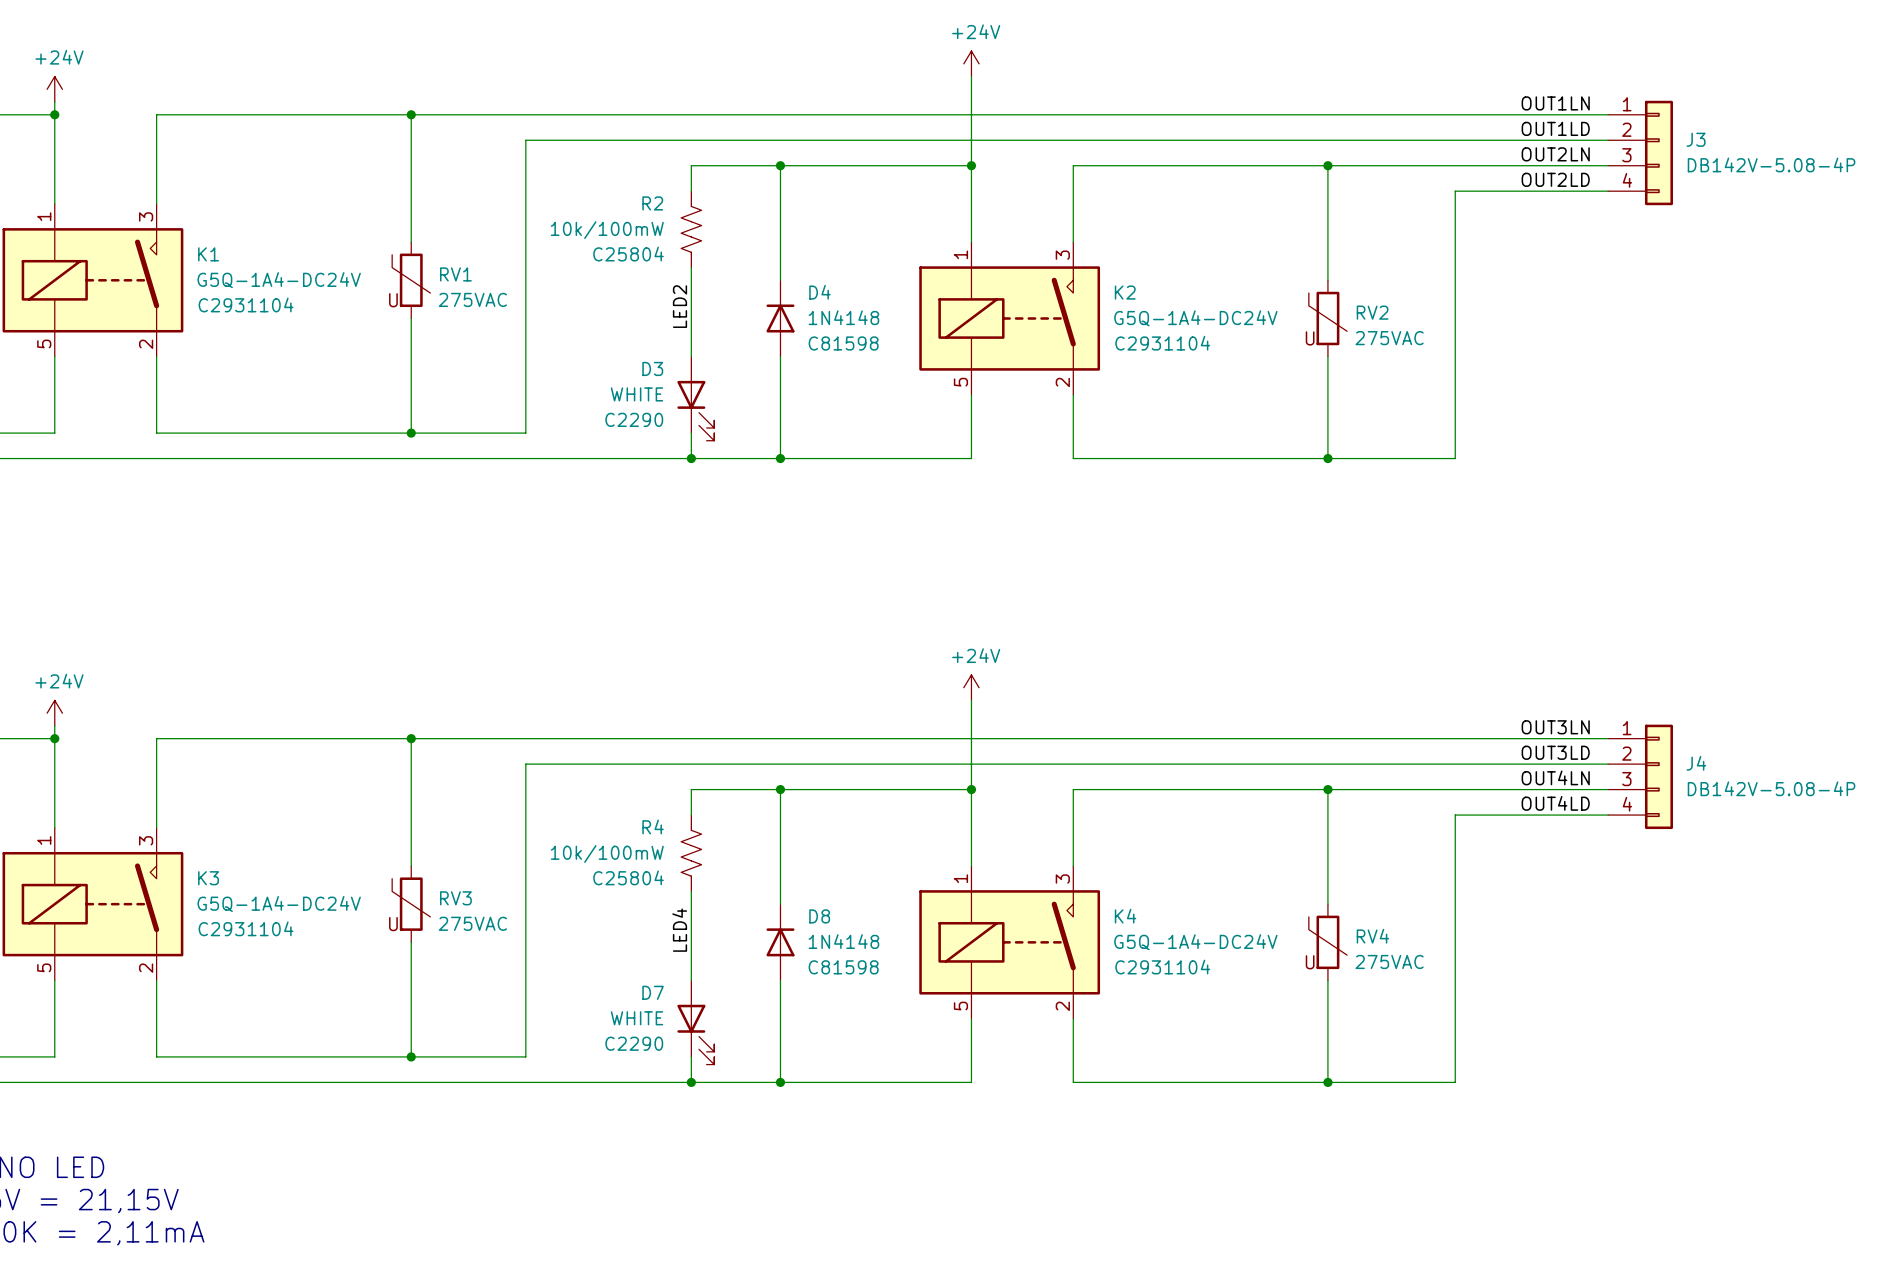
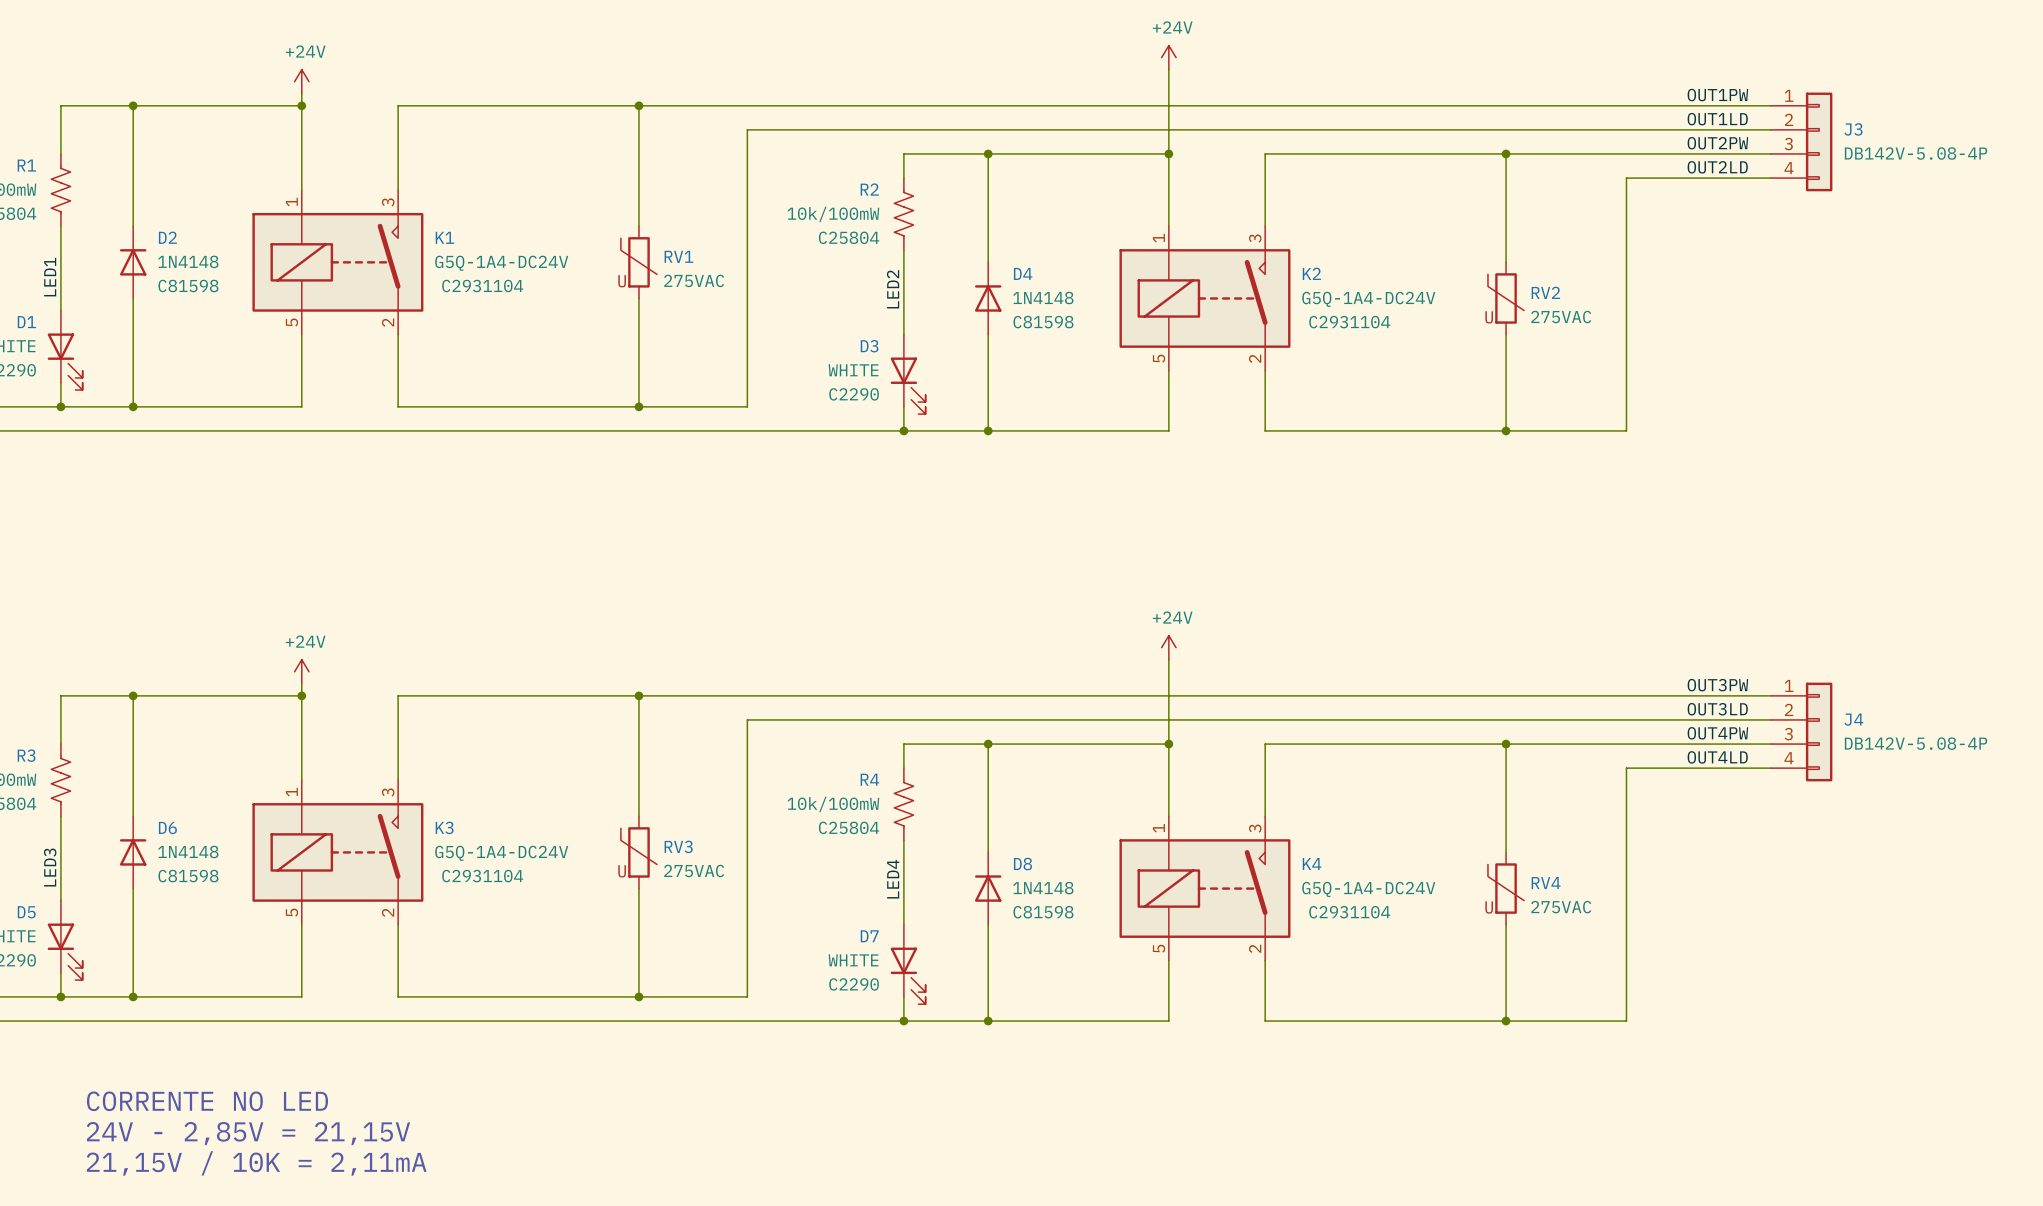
label: OUT1LN (1555, 103) -> OUT1PW (1717, 95)
label: OUT2LN (1555, 154) -> OUT2PW (1717, 143)
label: OUT3LN (1555, 727) -> OUT3PW (1717, 685)
label: OUT4LN (1555, 777) -> OUT4PW (1717, 733)

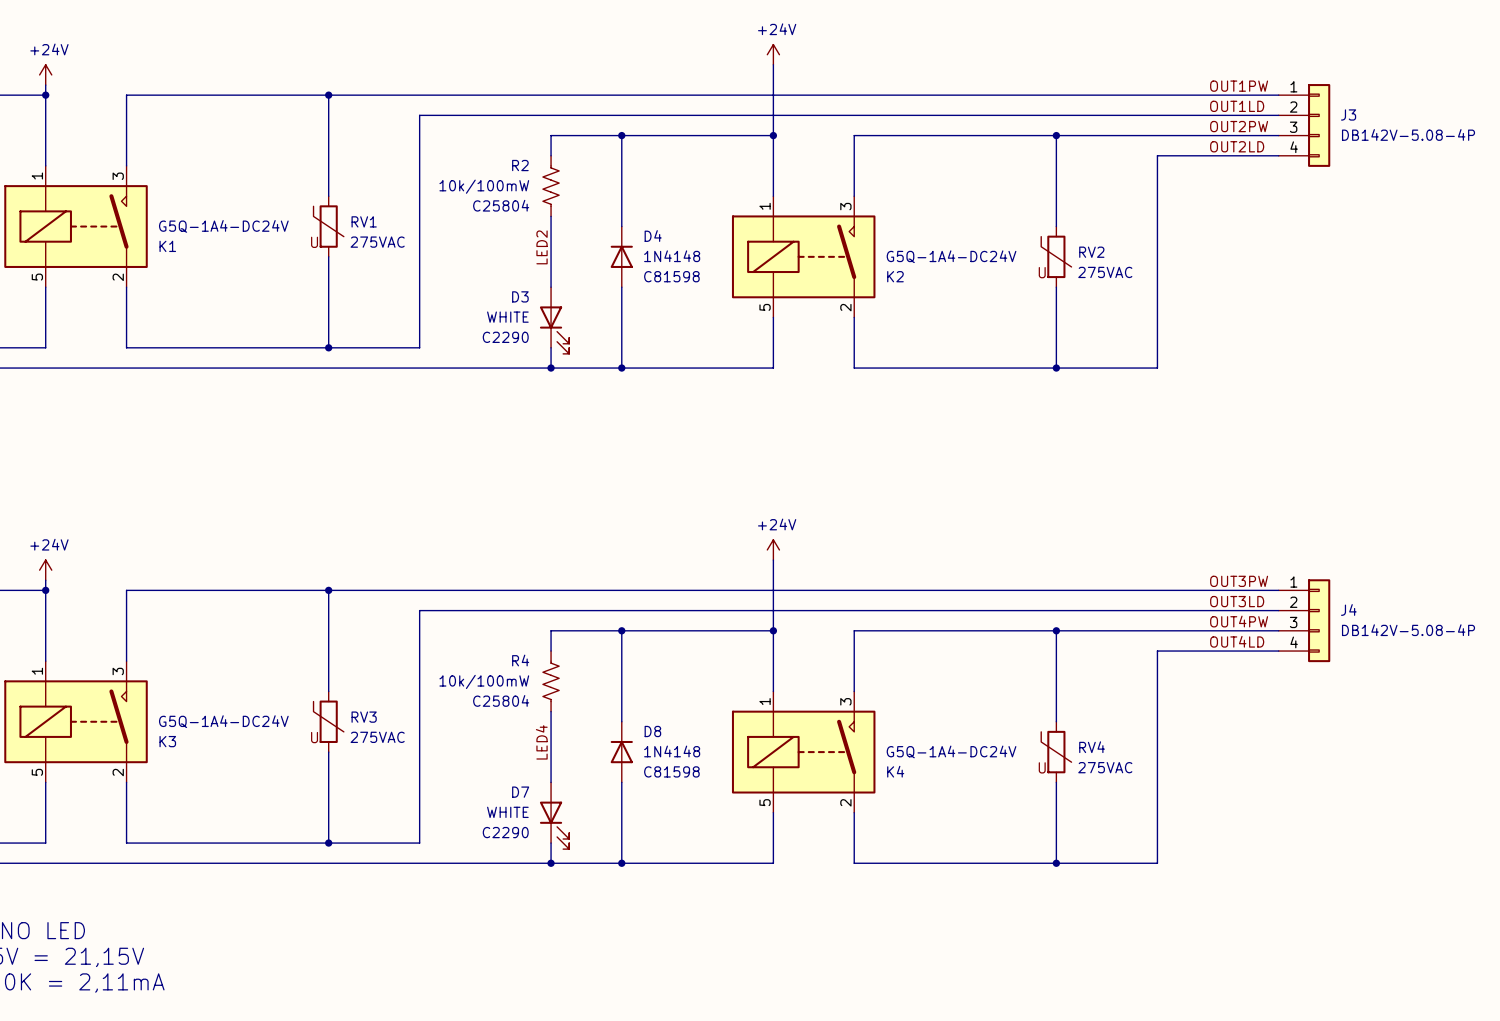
K1 name position: K1 (444, 237) -> K1 (167, 246)
K2 name position: K2 (1311, 273) -> K2 (895, 276)
K1 text: C2931104 (482, 285) -> none
K2 text: C2931104 (1349, 322) -> none
K3 name position: K3 (444, 827) -> K3 (167, 741)
K4 name position: K4 (1312, 864) -> K4 (895, 771)
K3 text: C2931104 (482, 876) -> none
K4 text: C2931104 (1349, 912) -> none

